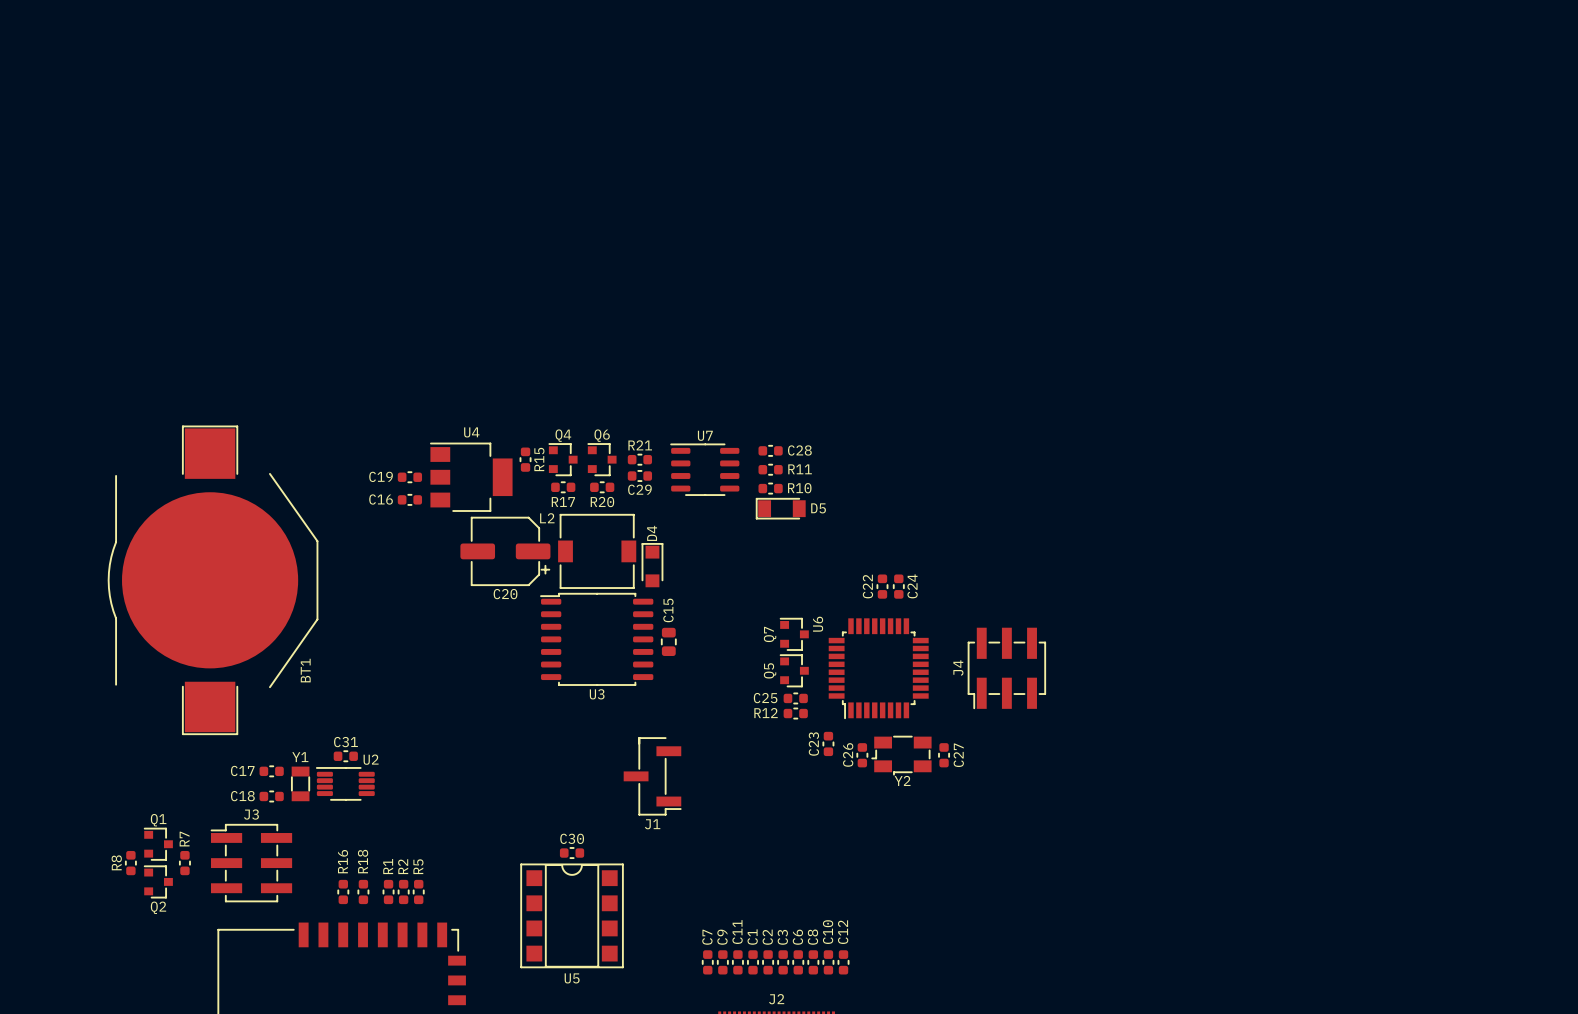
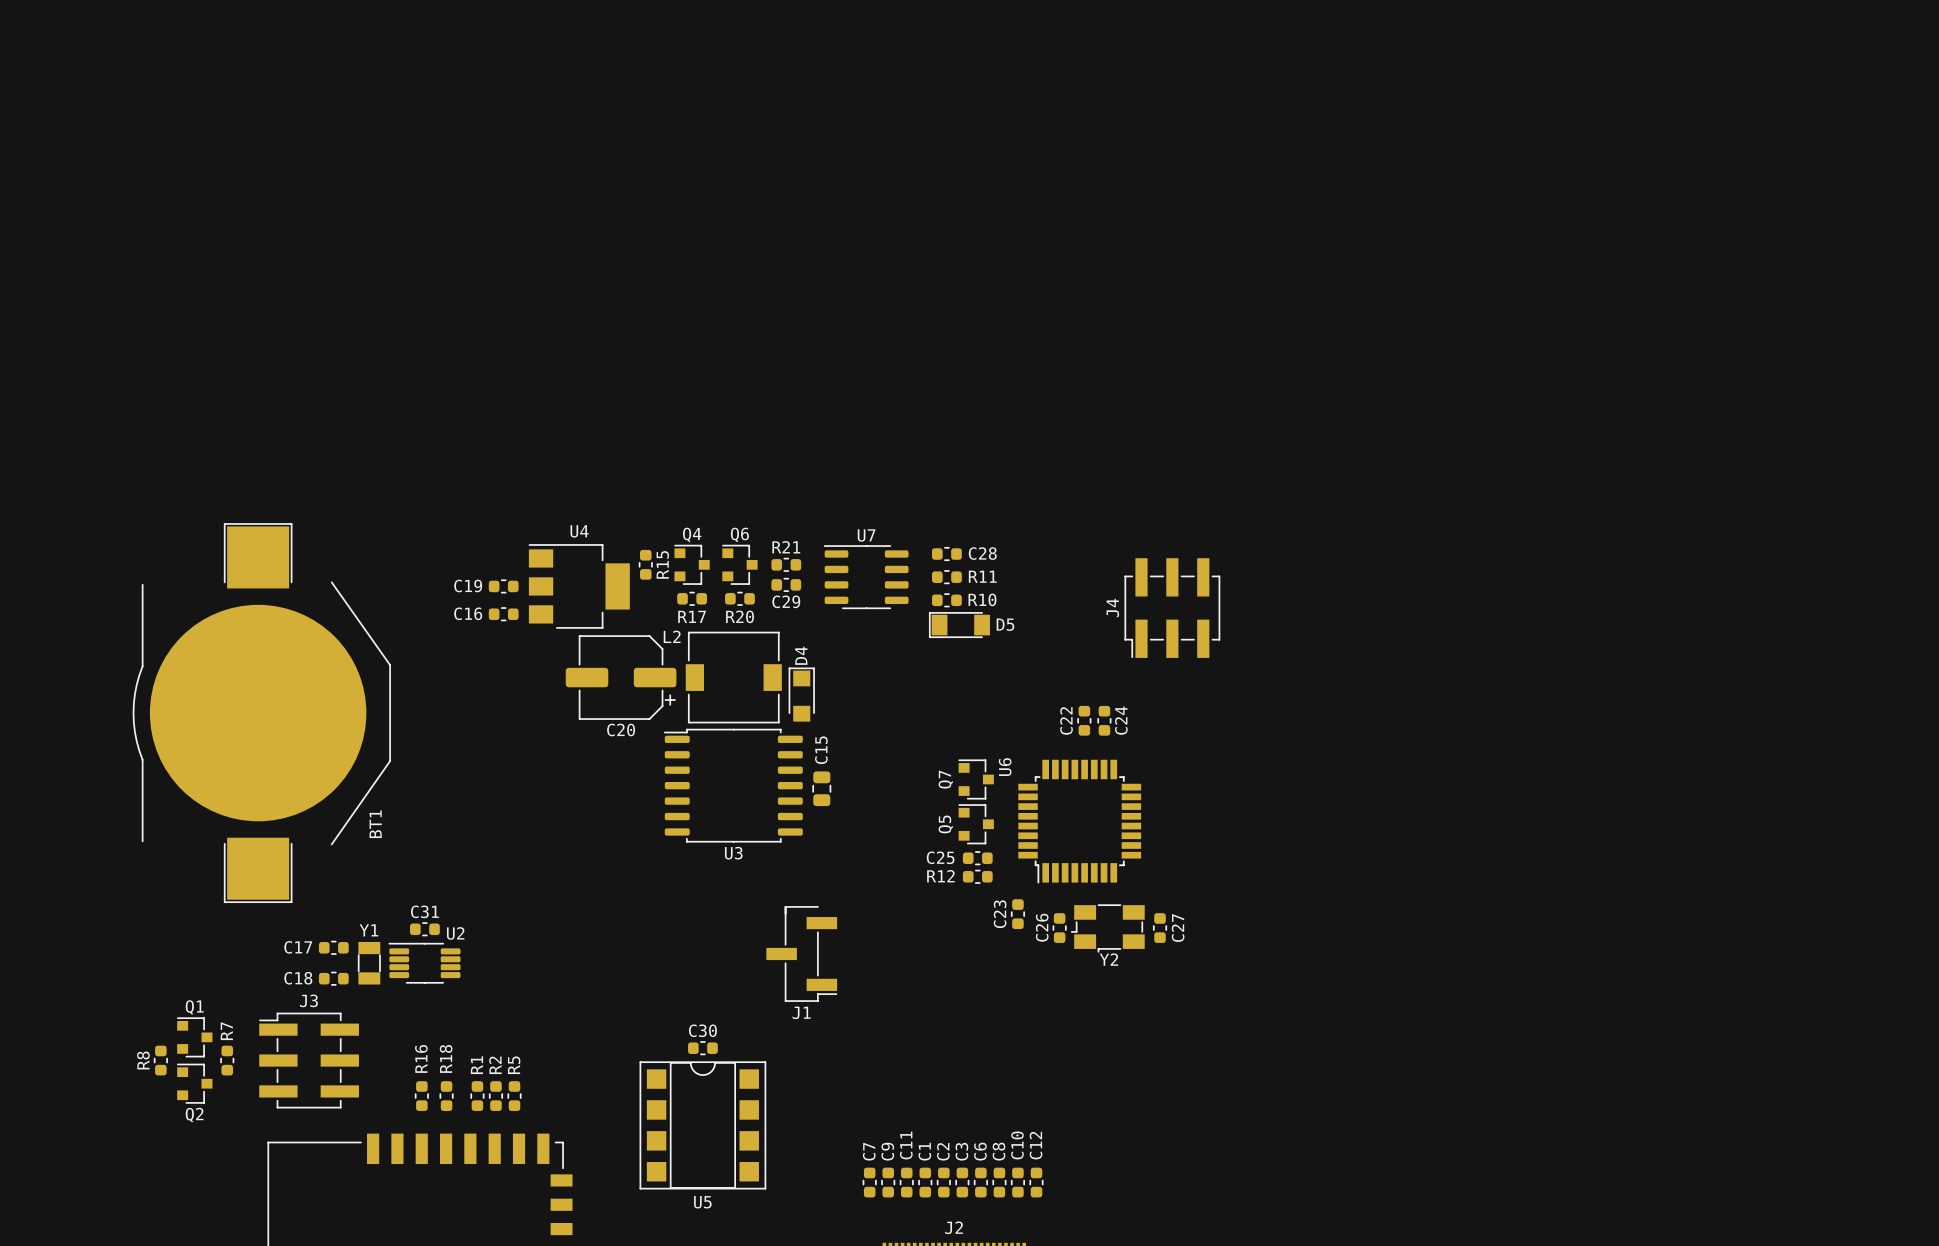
J4 position: (1006, 668) -> (1172, 608)

